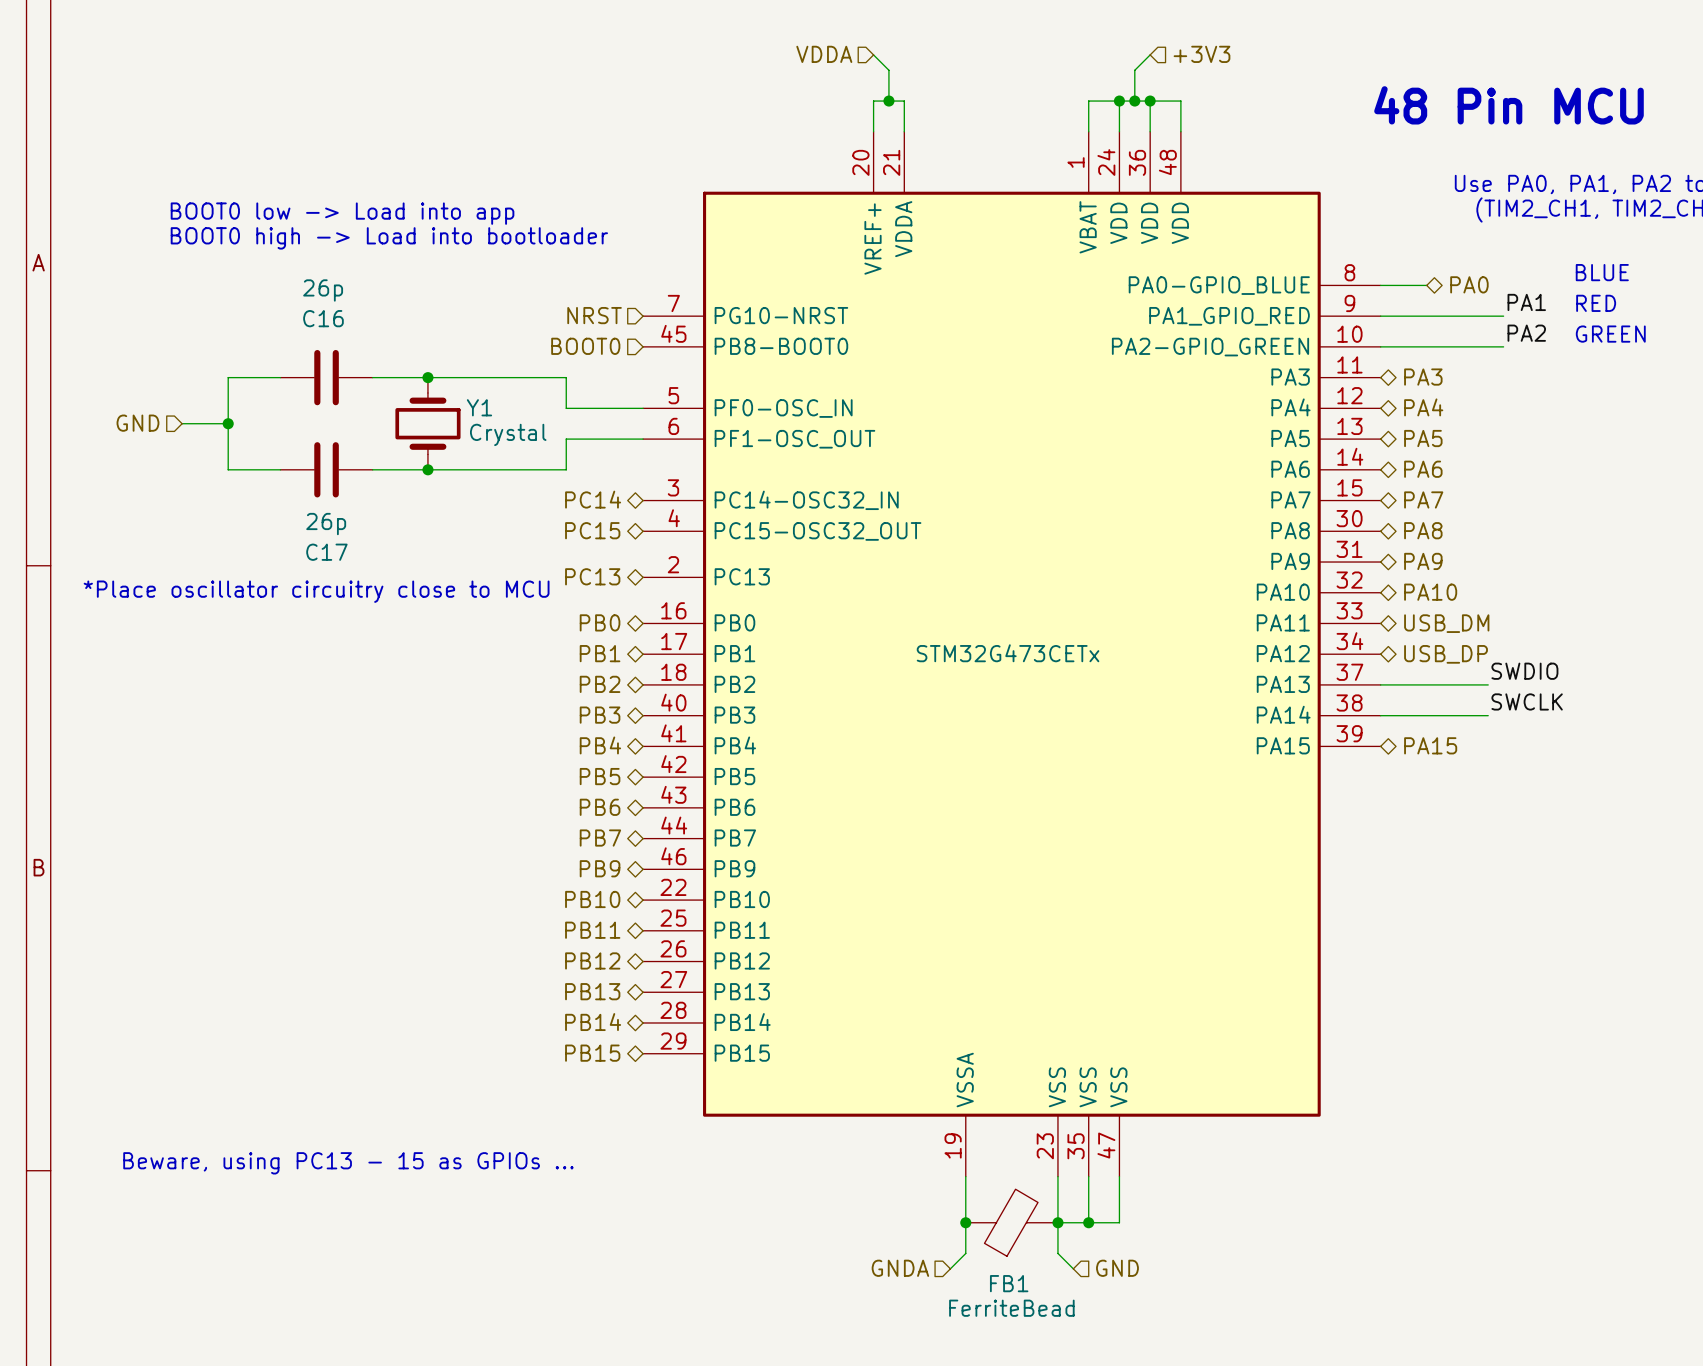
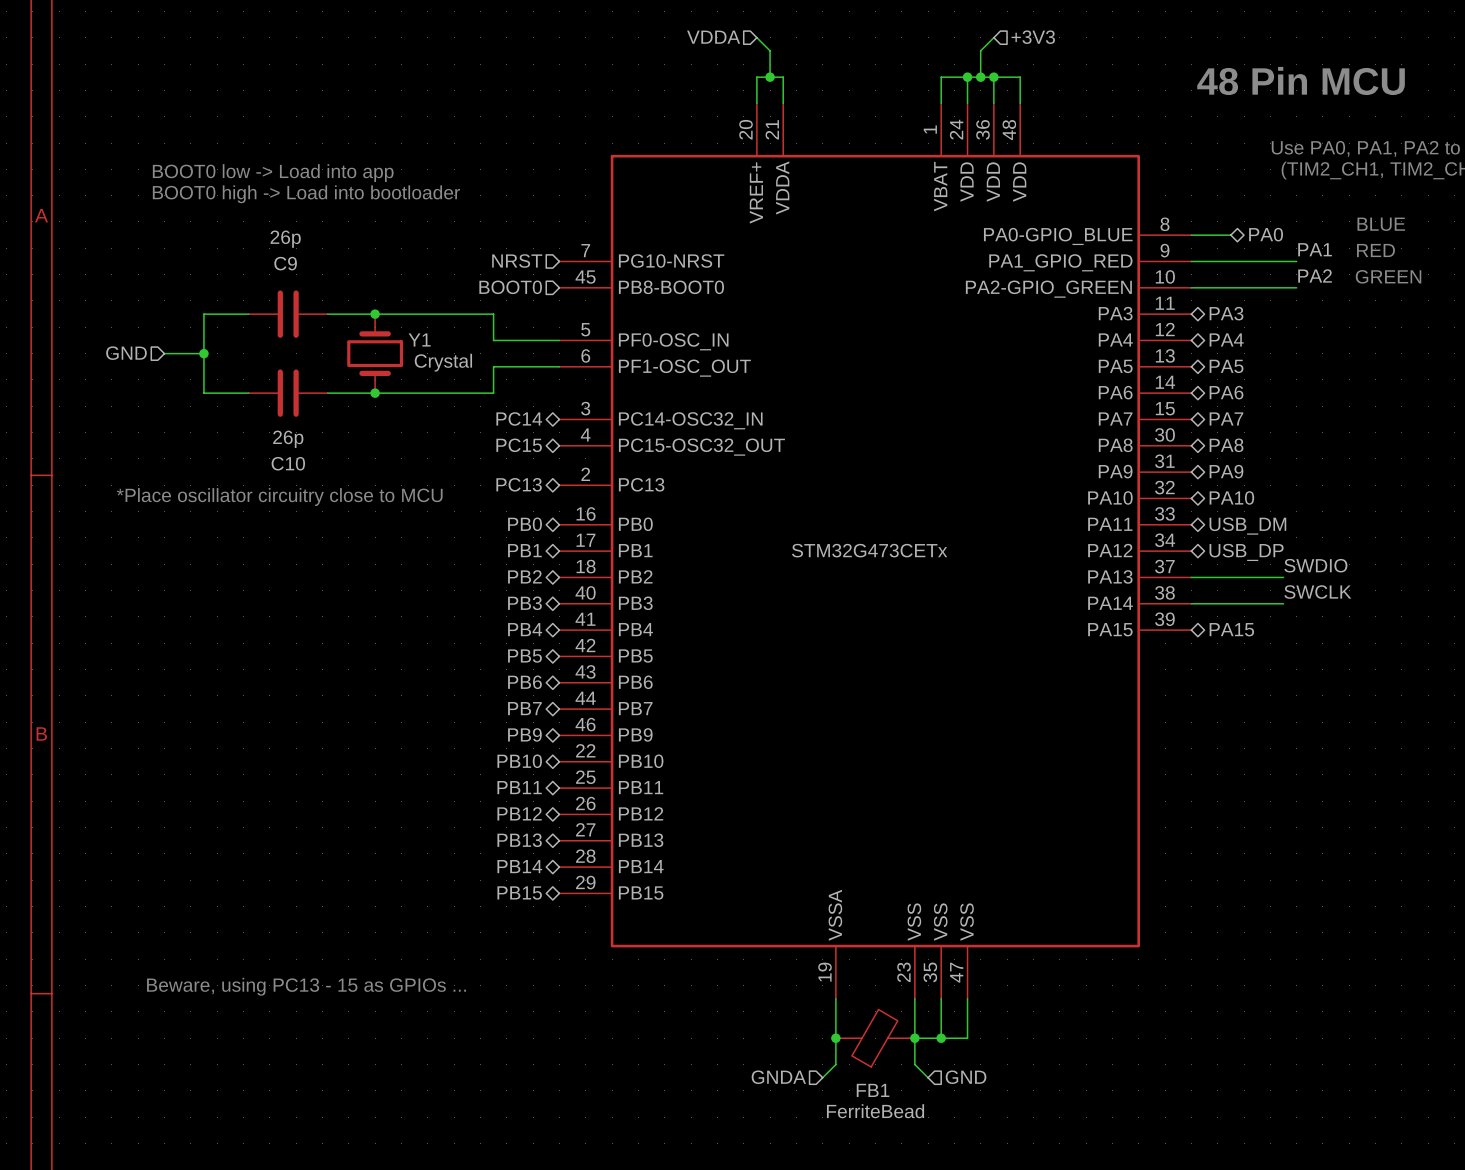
C16 name: C16 (323, 318) -> C9 (285, 263)
C17 name: C17 (326, 552) -> C10 (288, 463)

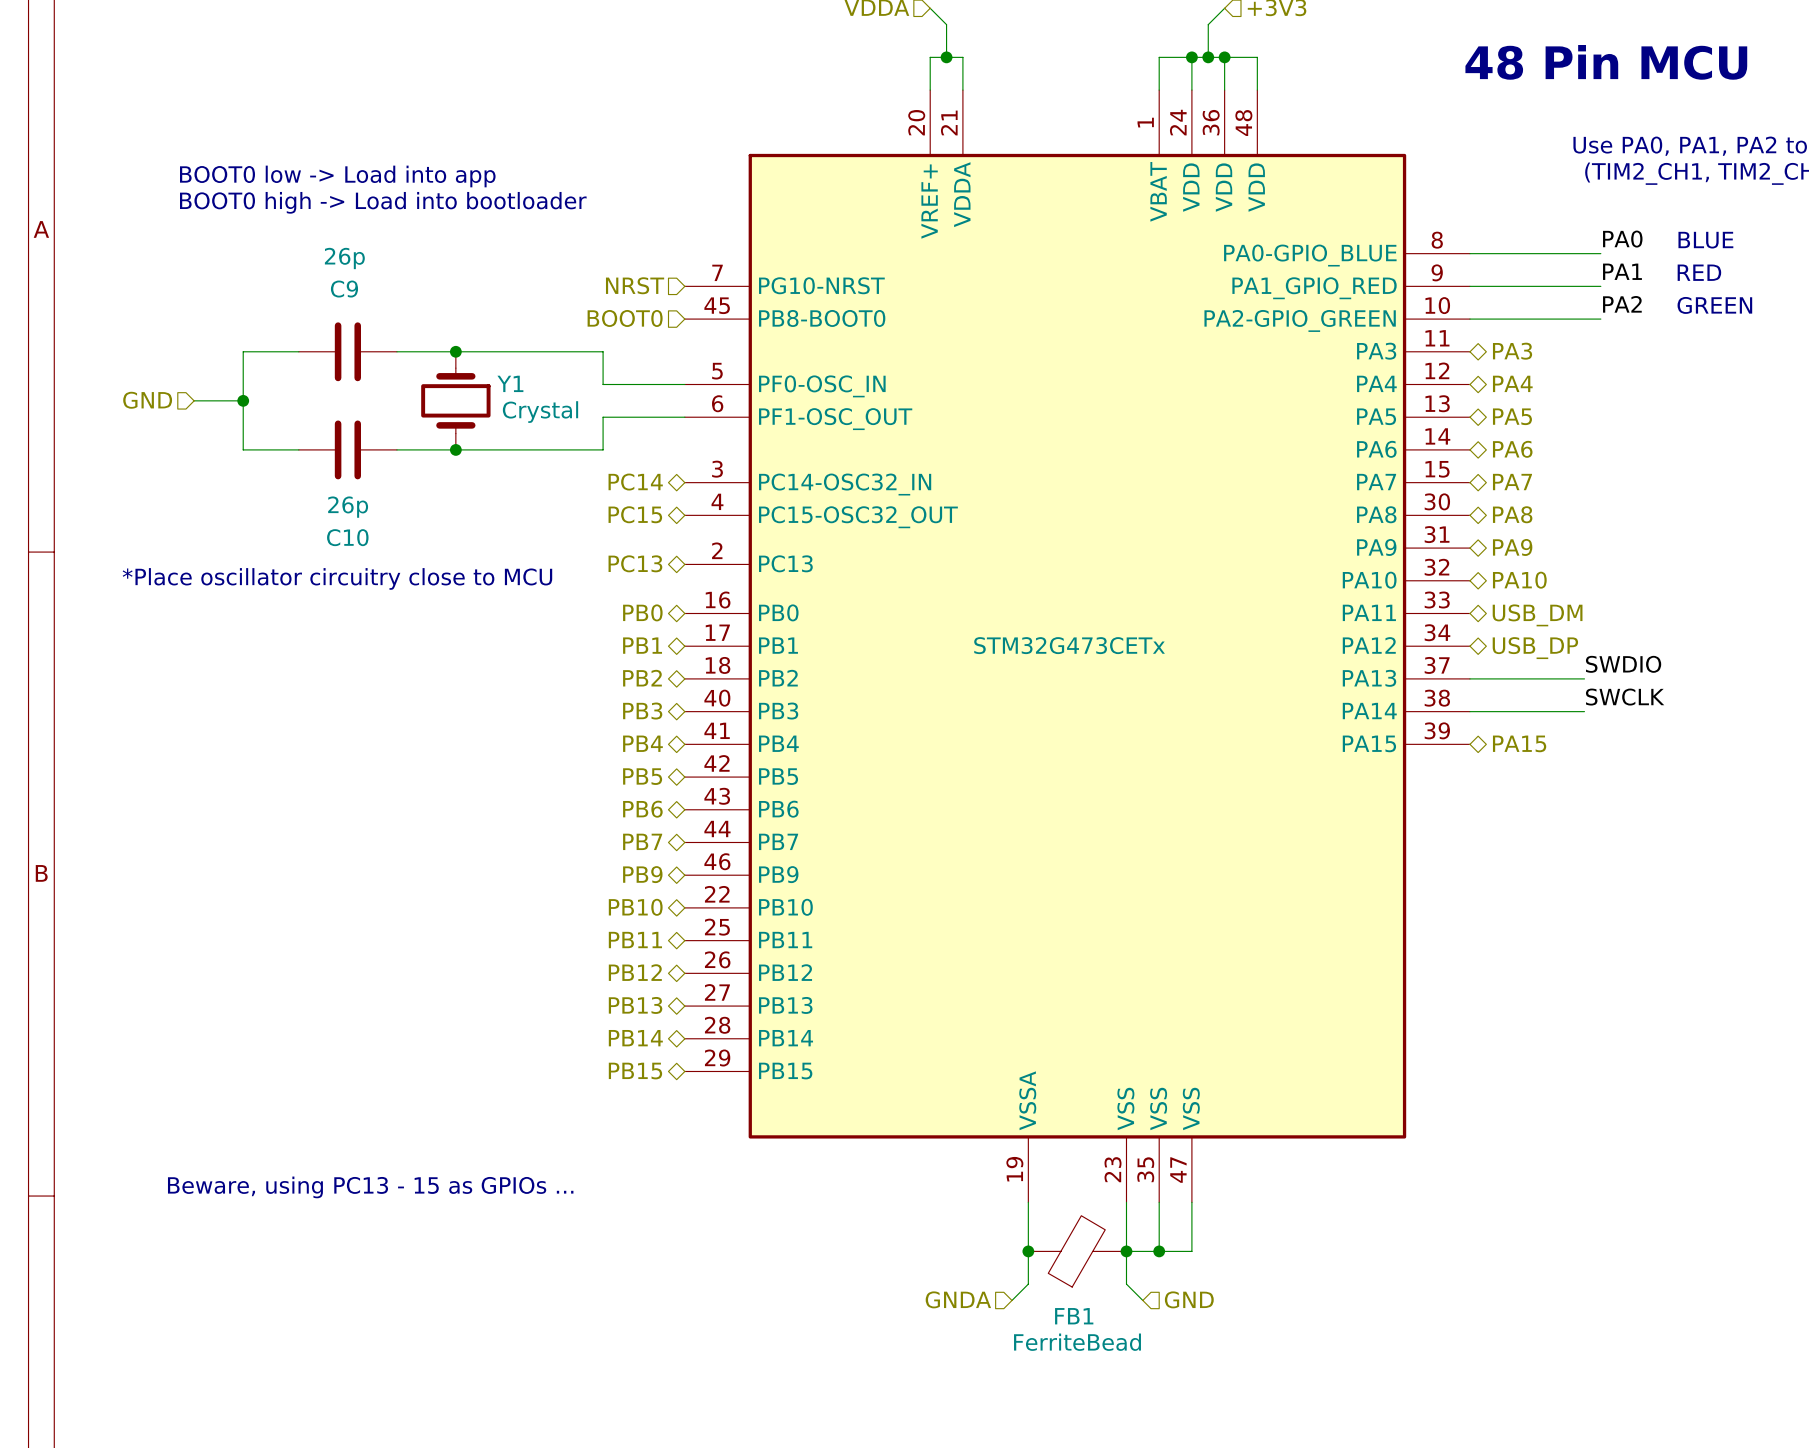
label: none -> PA0 (1622, 239)
hierarchical label: PA0 (1266, 234) -> none
wire: none -> (1519, 253) (1600, 253)

